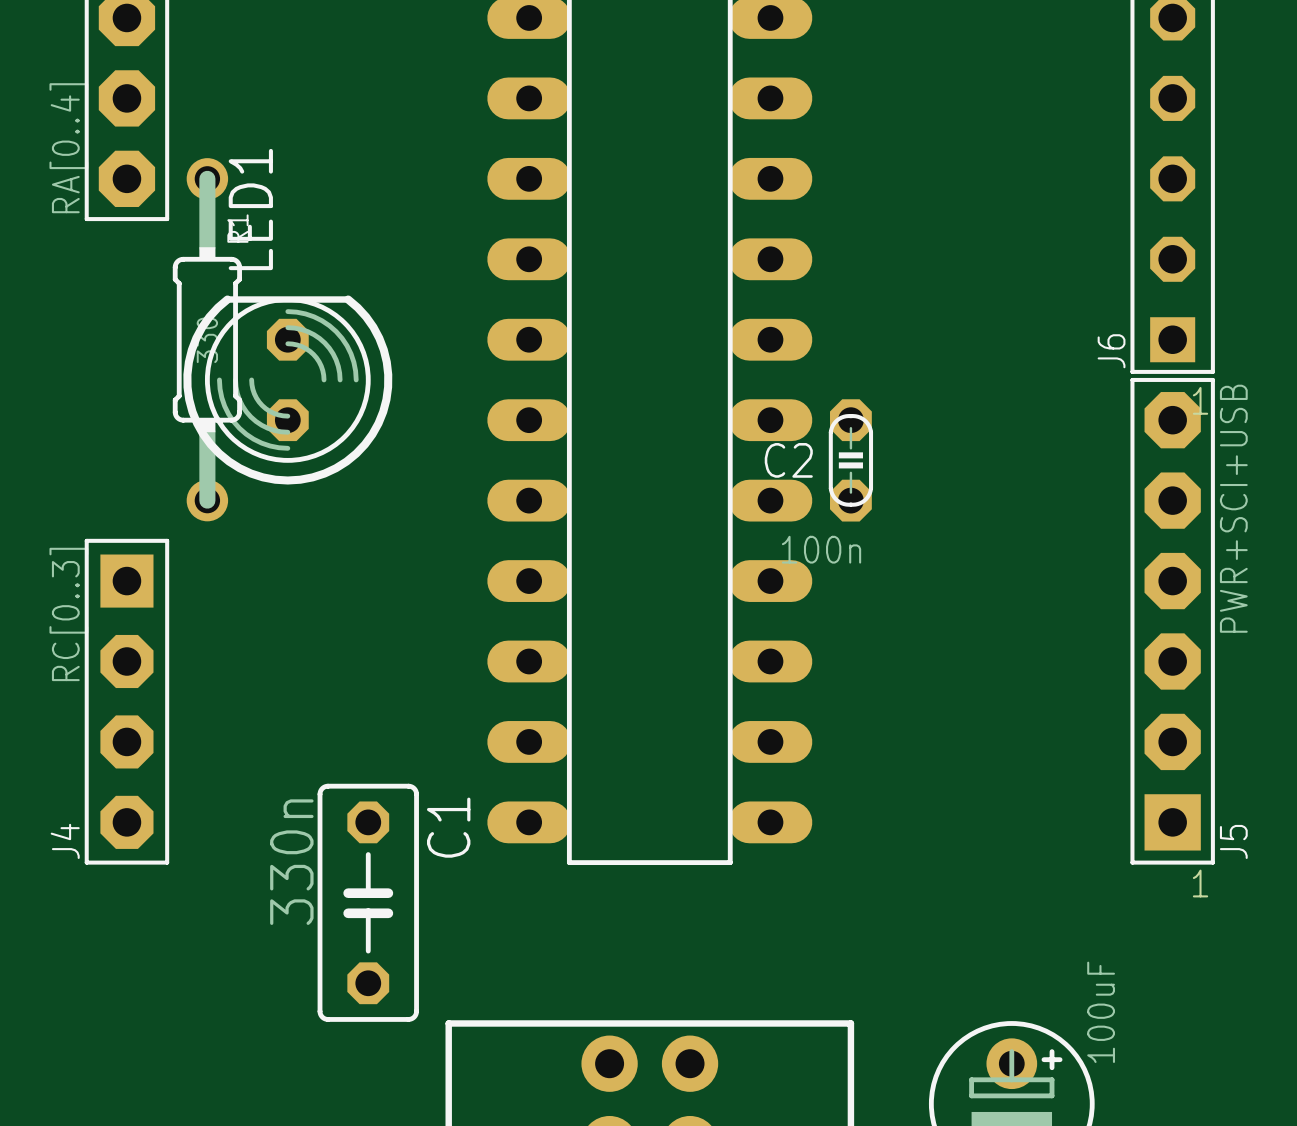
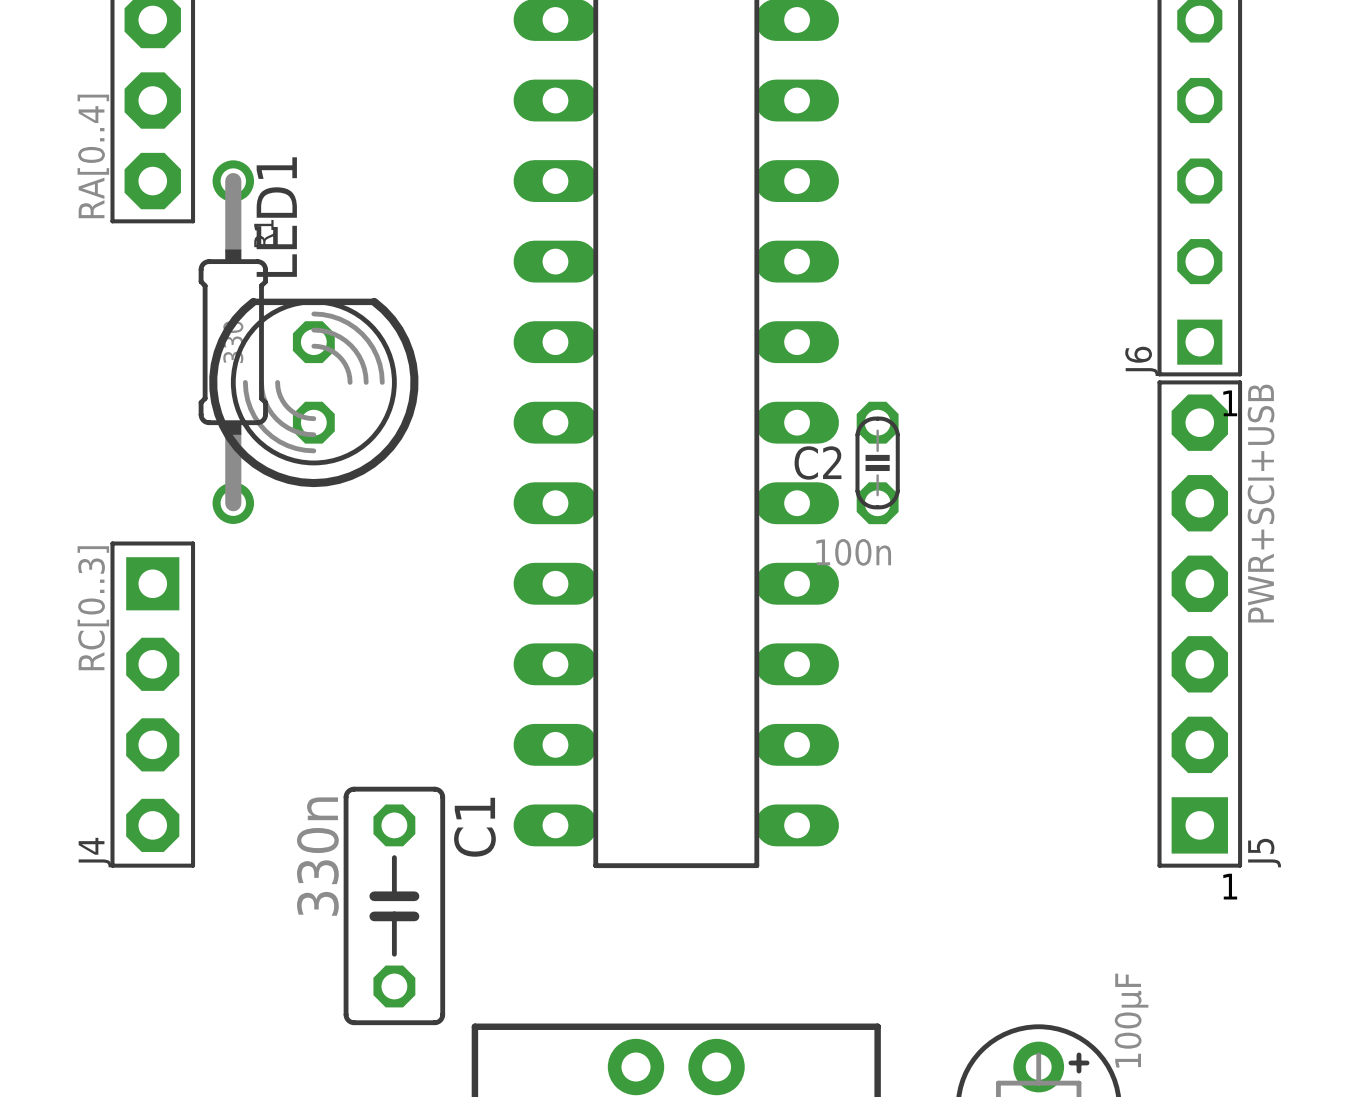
part value: 100uF (1101, 1012) -> 100μF (1131, 1020)

